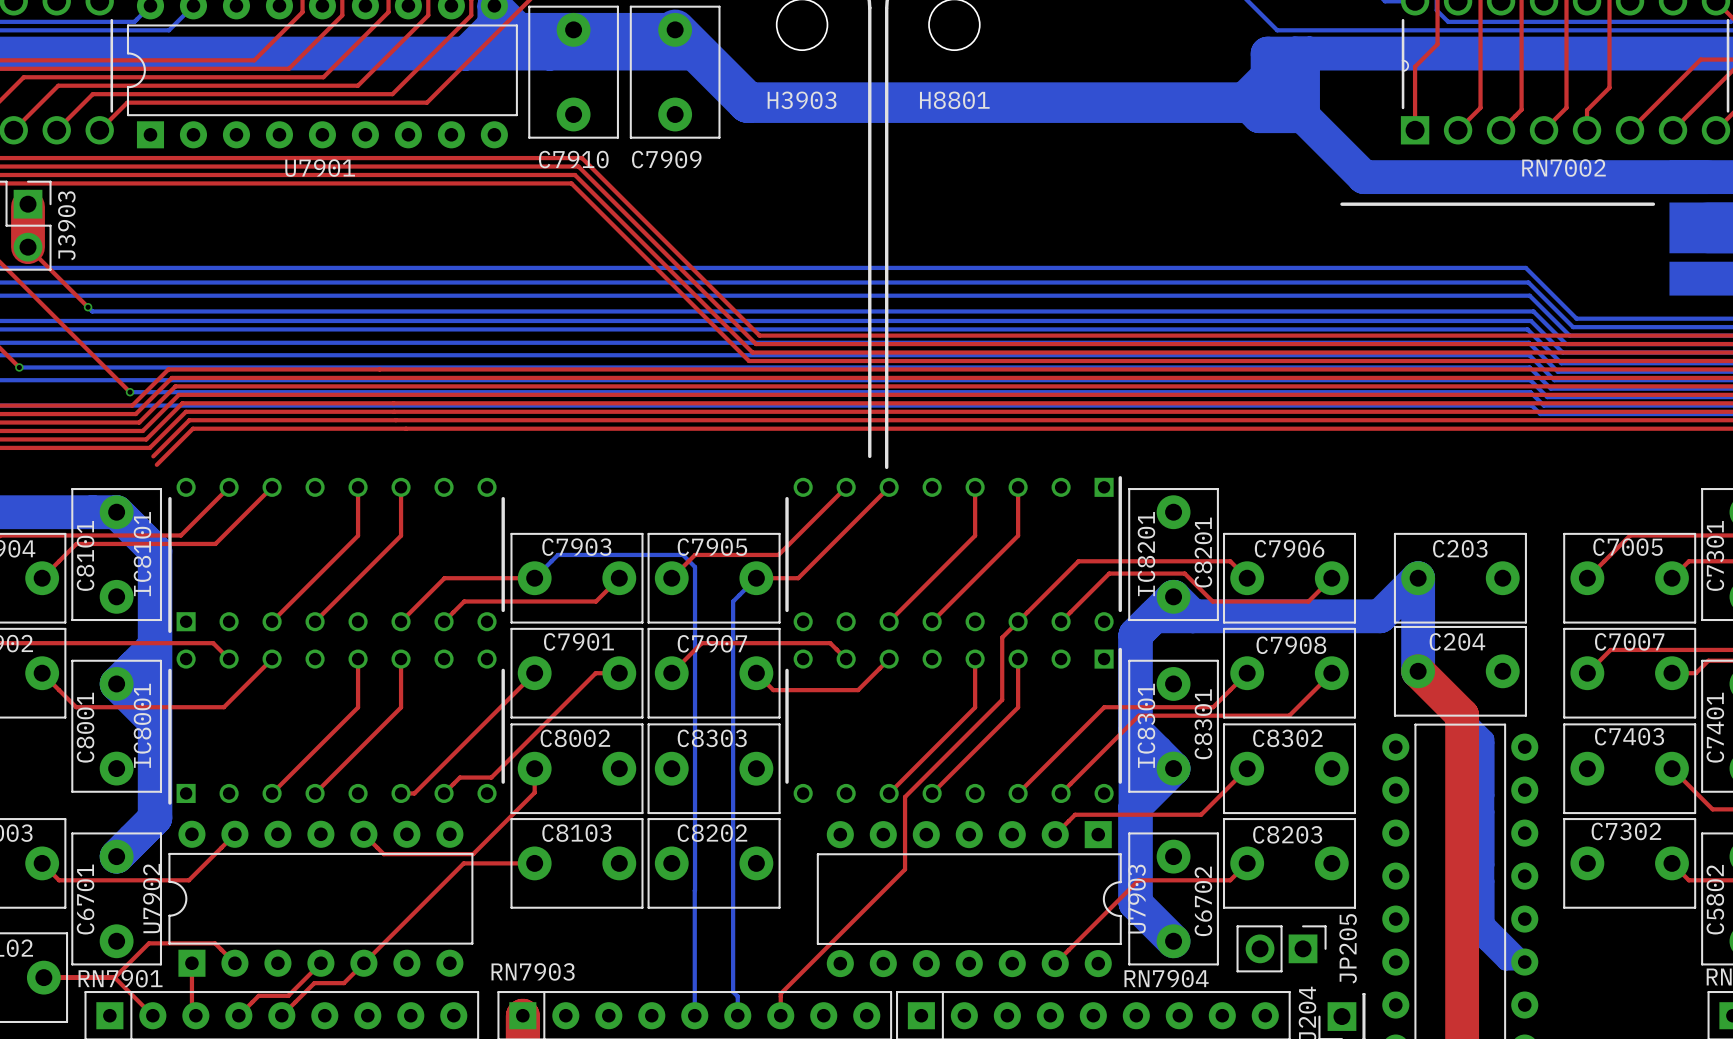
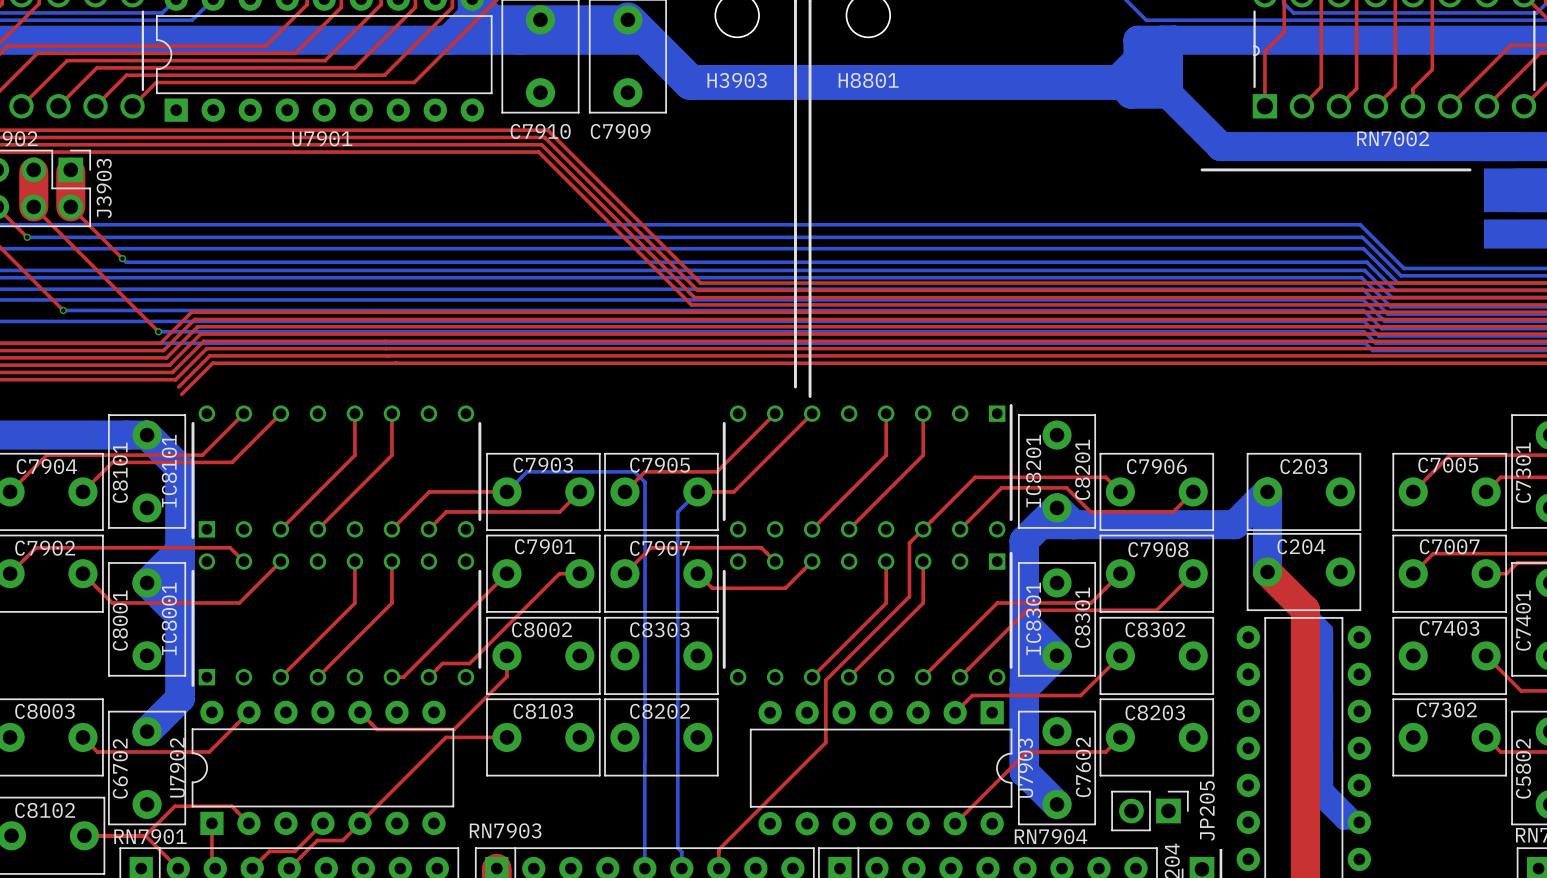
C6701 name: C6701 (85, 899) -> C6702 (120, 768)
C6702 name: C6702 (1203, 901) -> C7602 (1083, 767)

